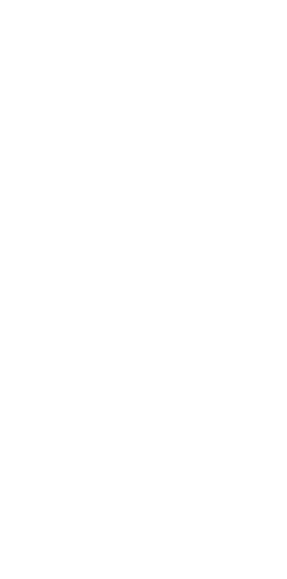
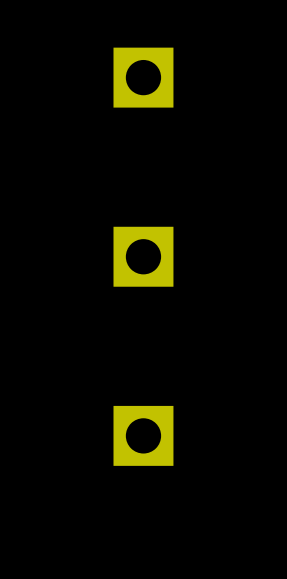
part: none -> (143, 77)
part: none -> (143, 256)
part: none -> (143, 435)

